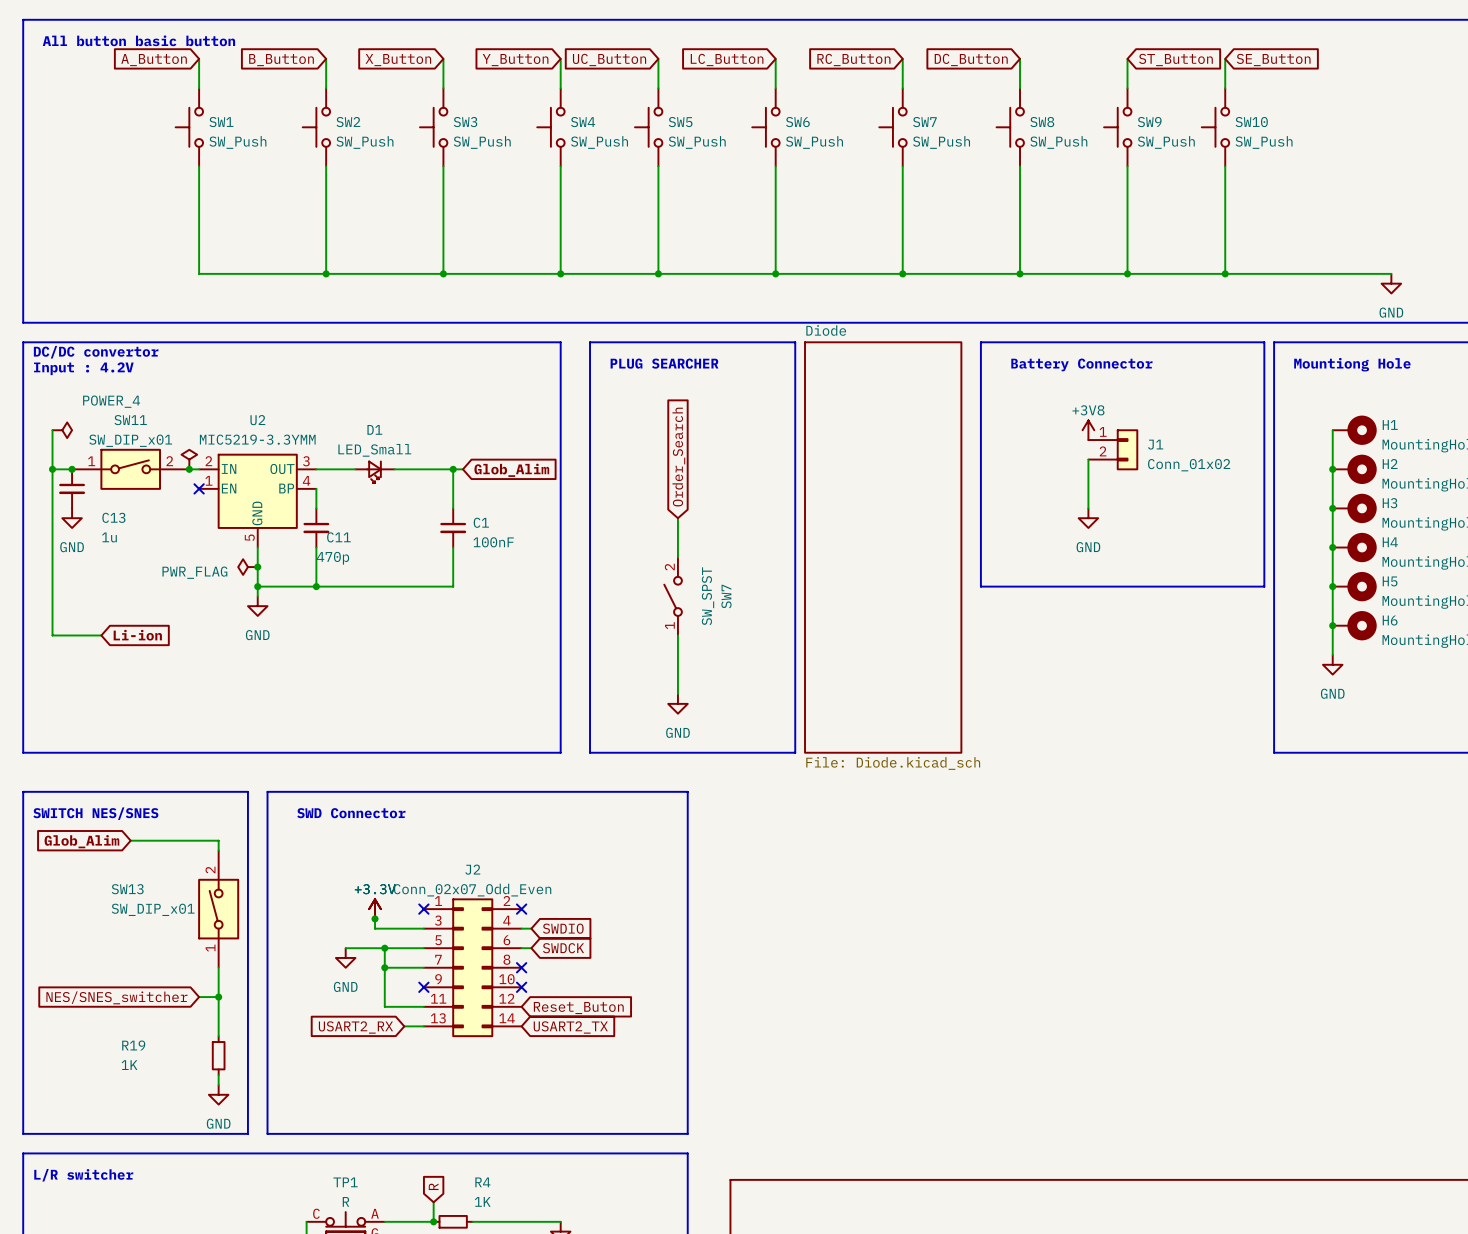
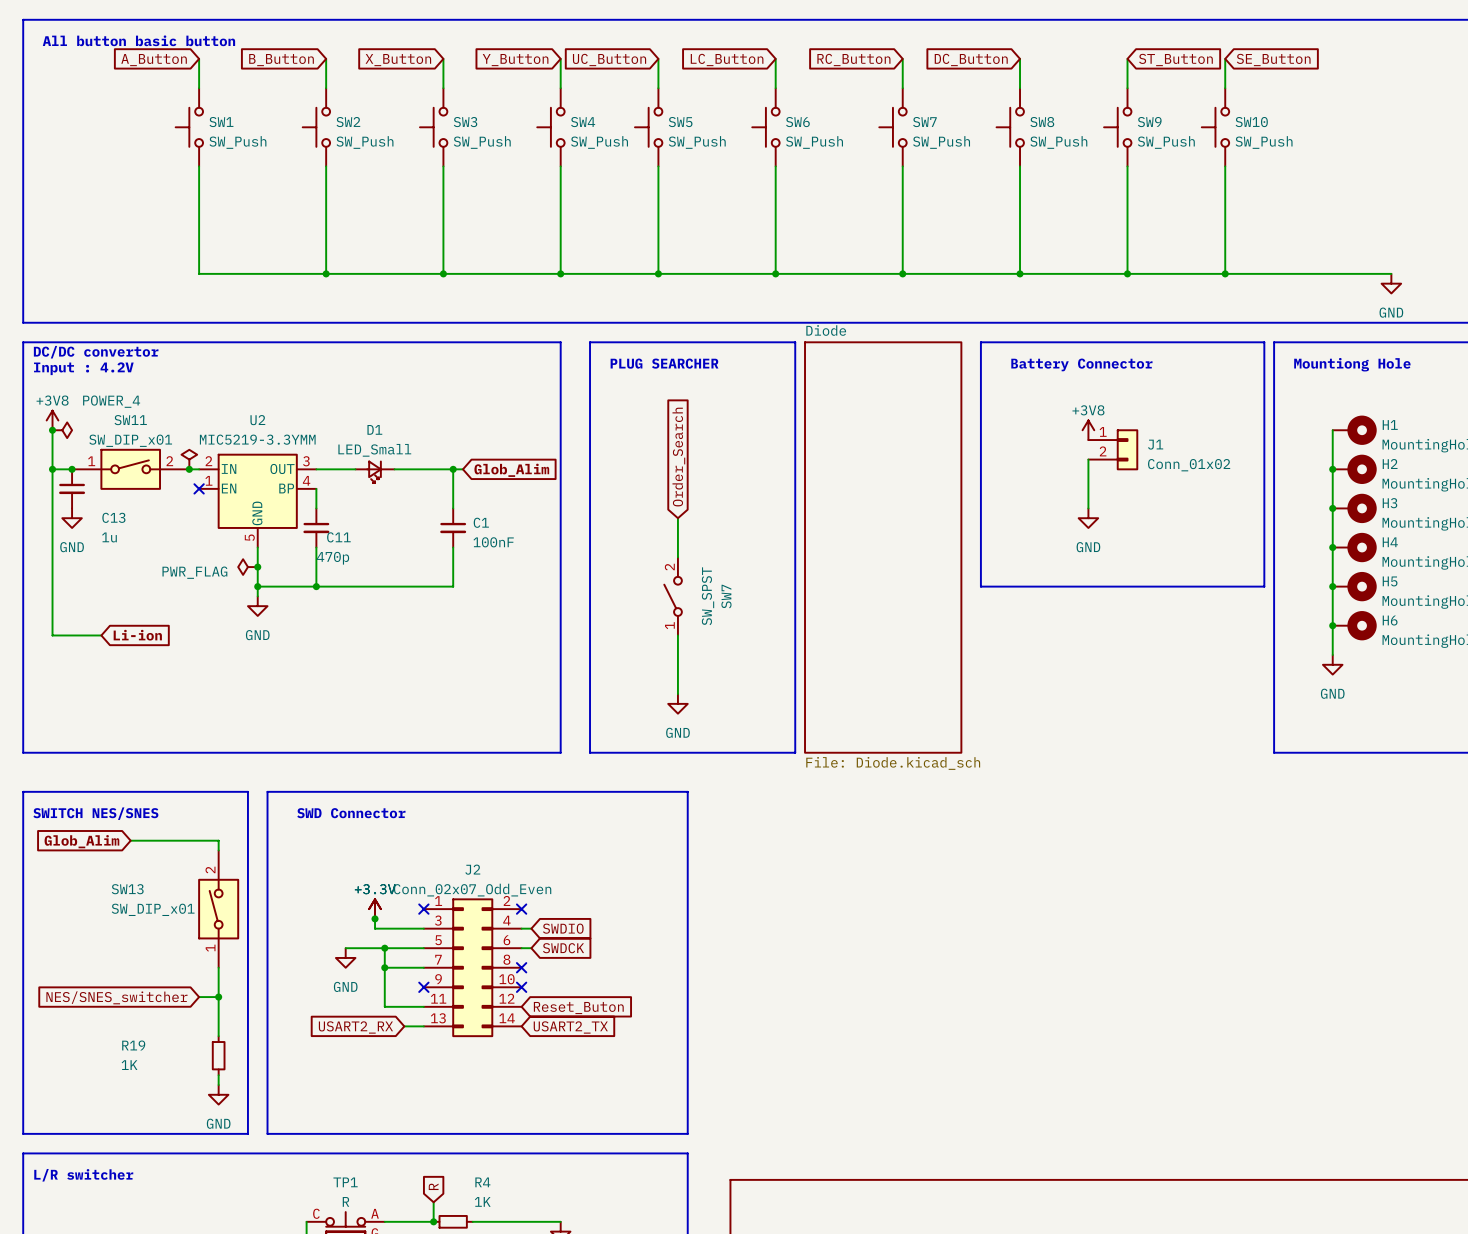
power symbol: none -> +3V8 (52, 420)
junction: none -> (52, 430)

